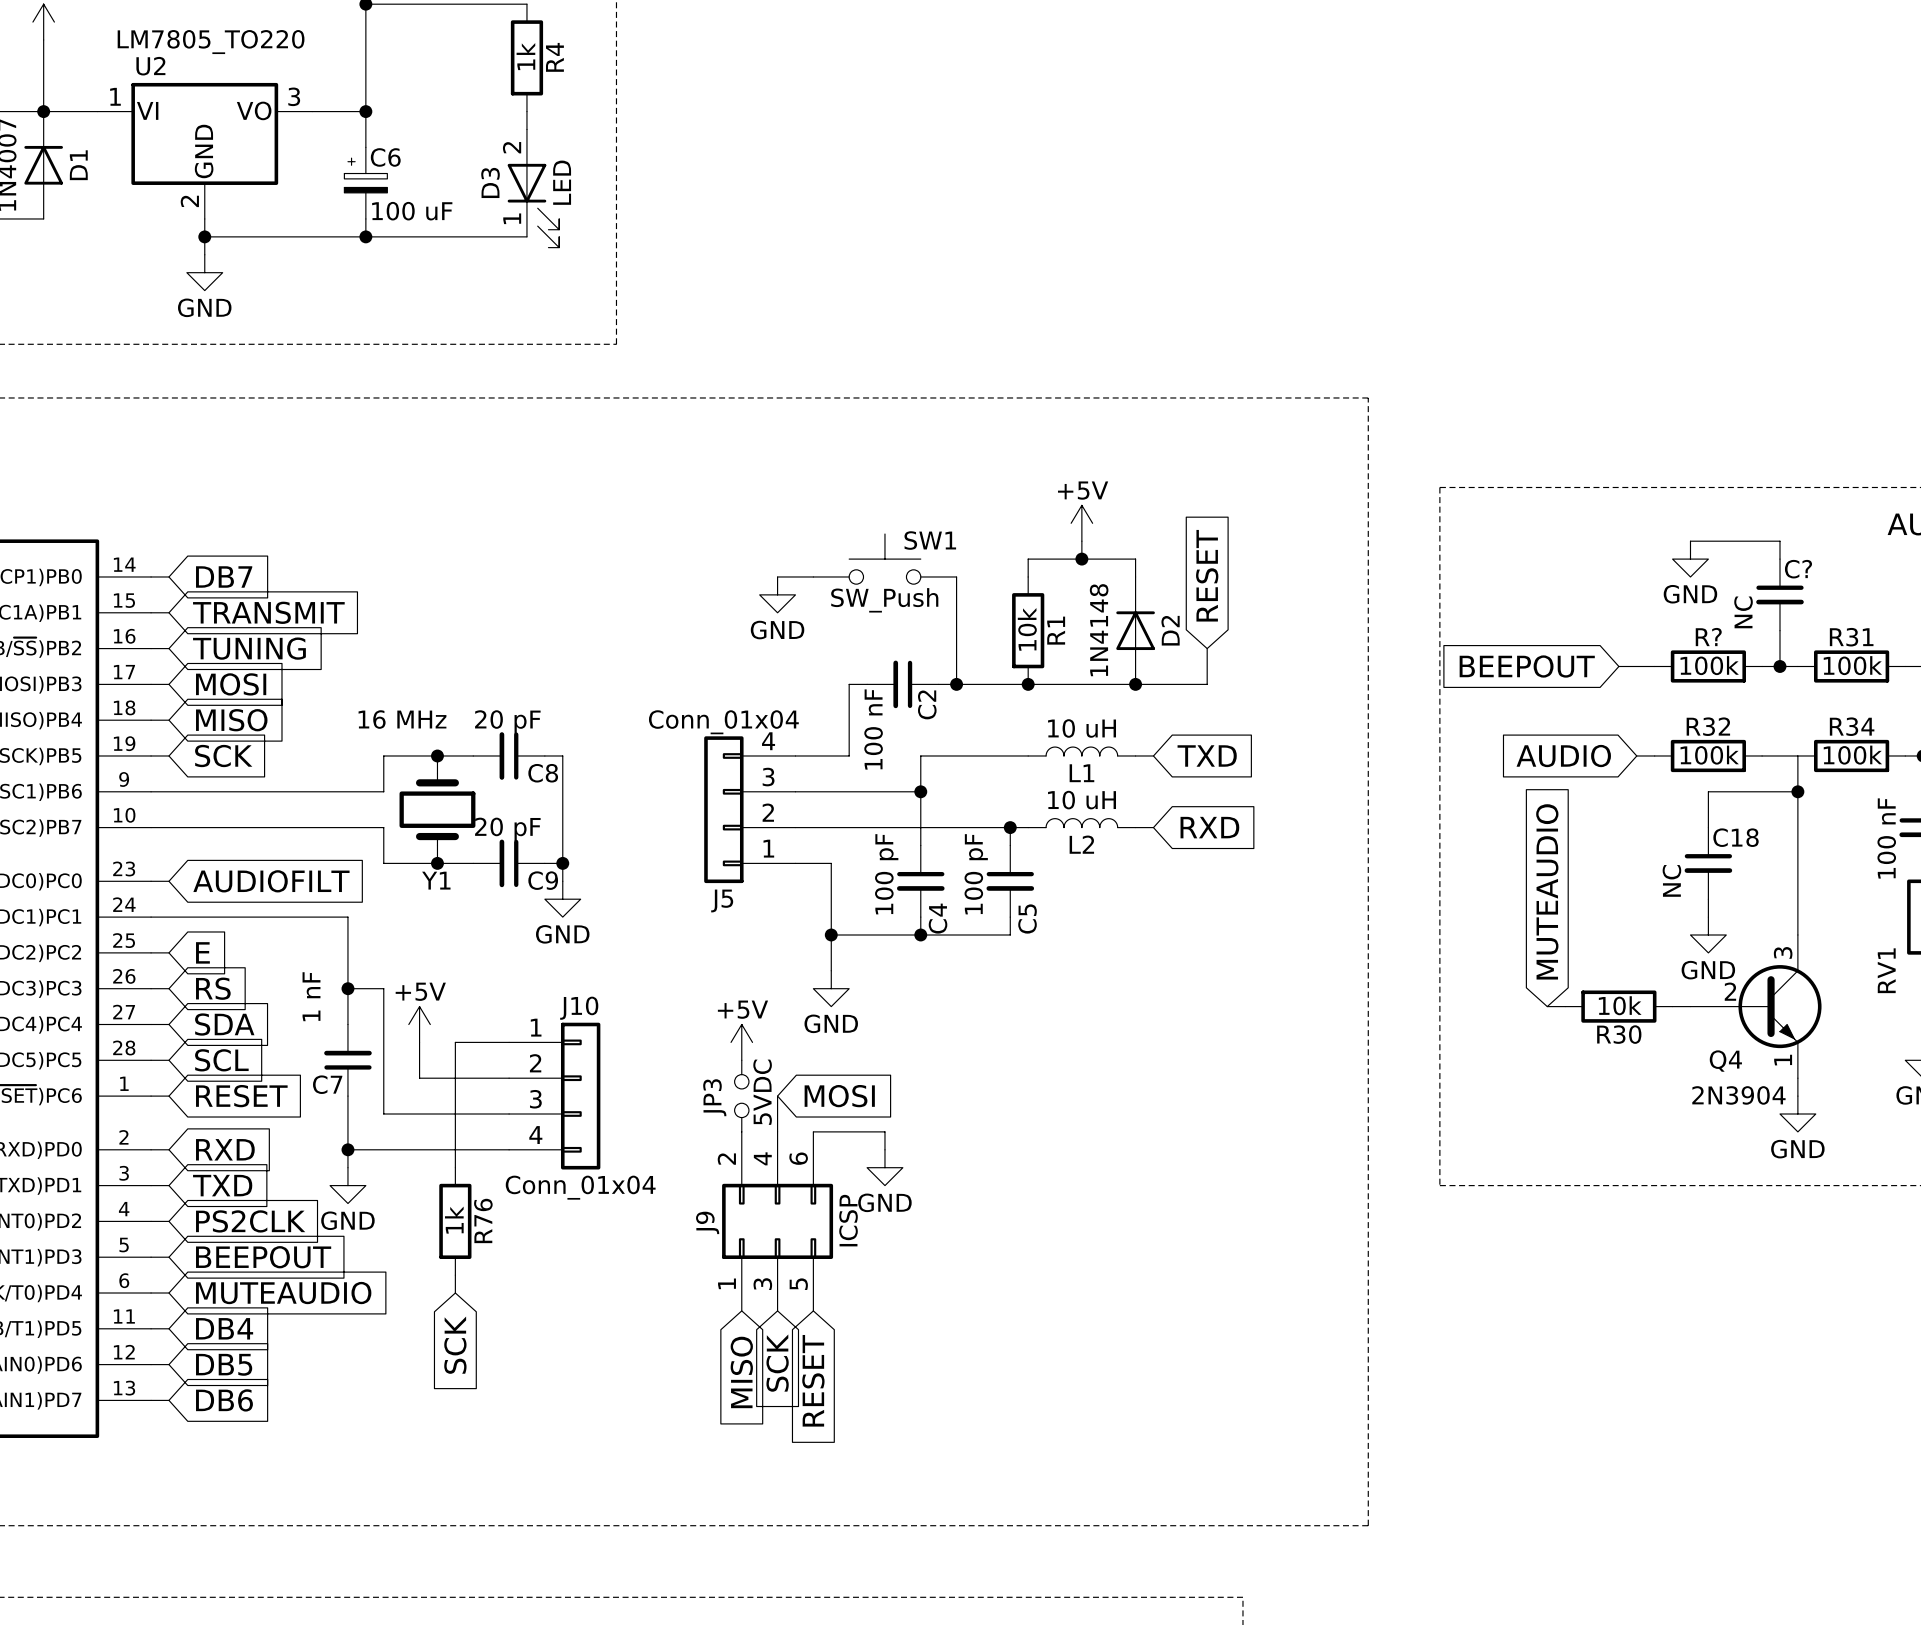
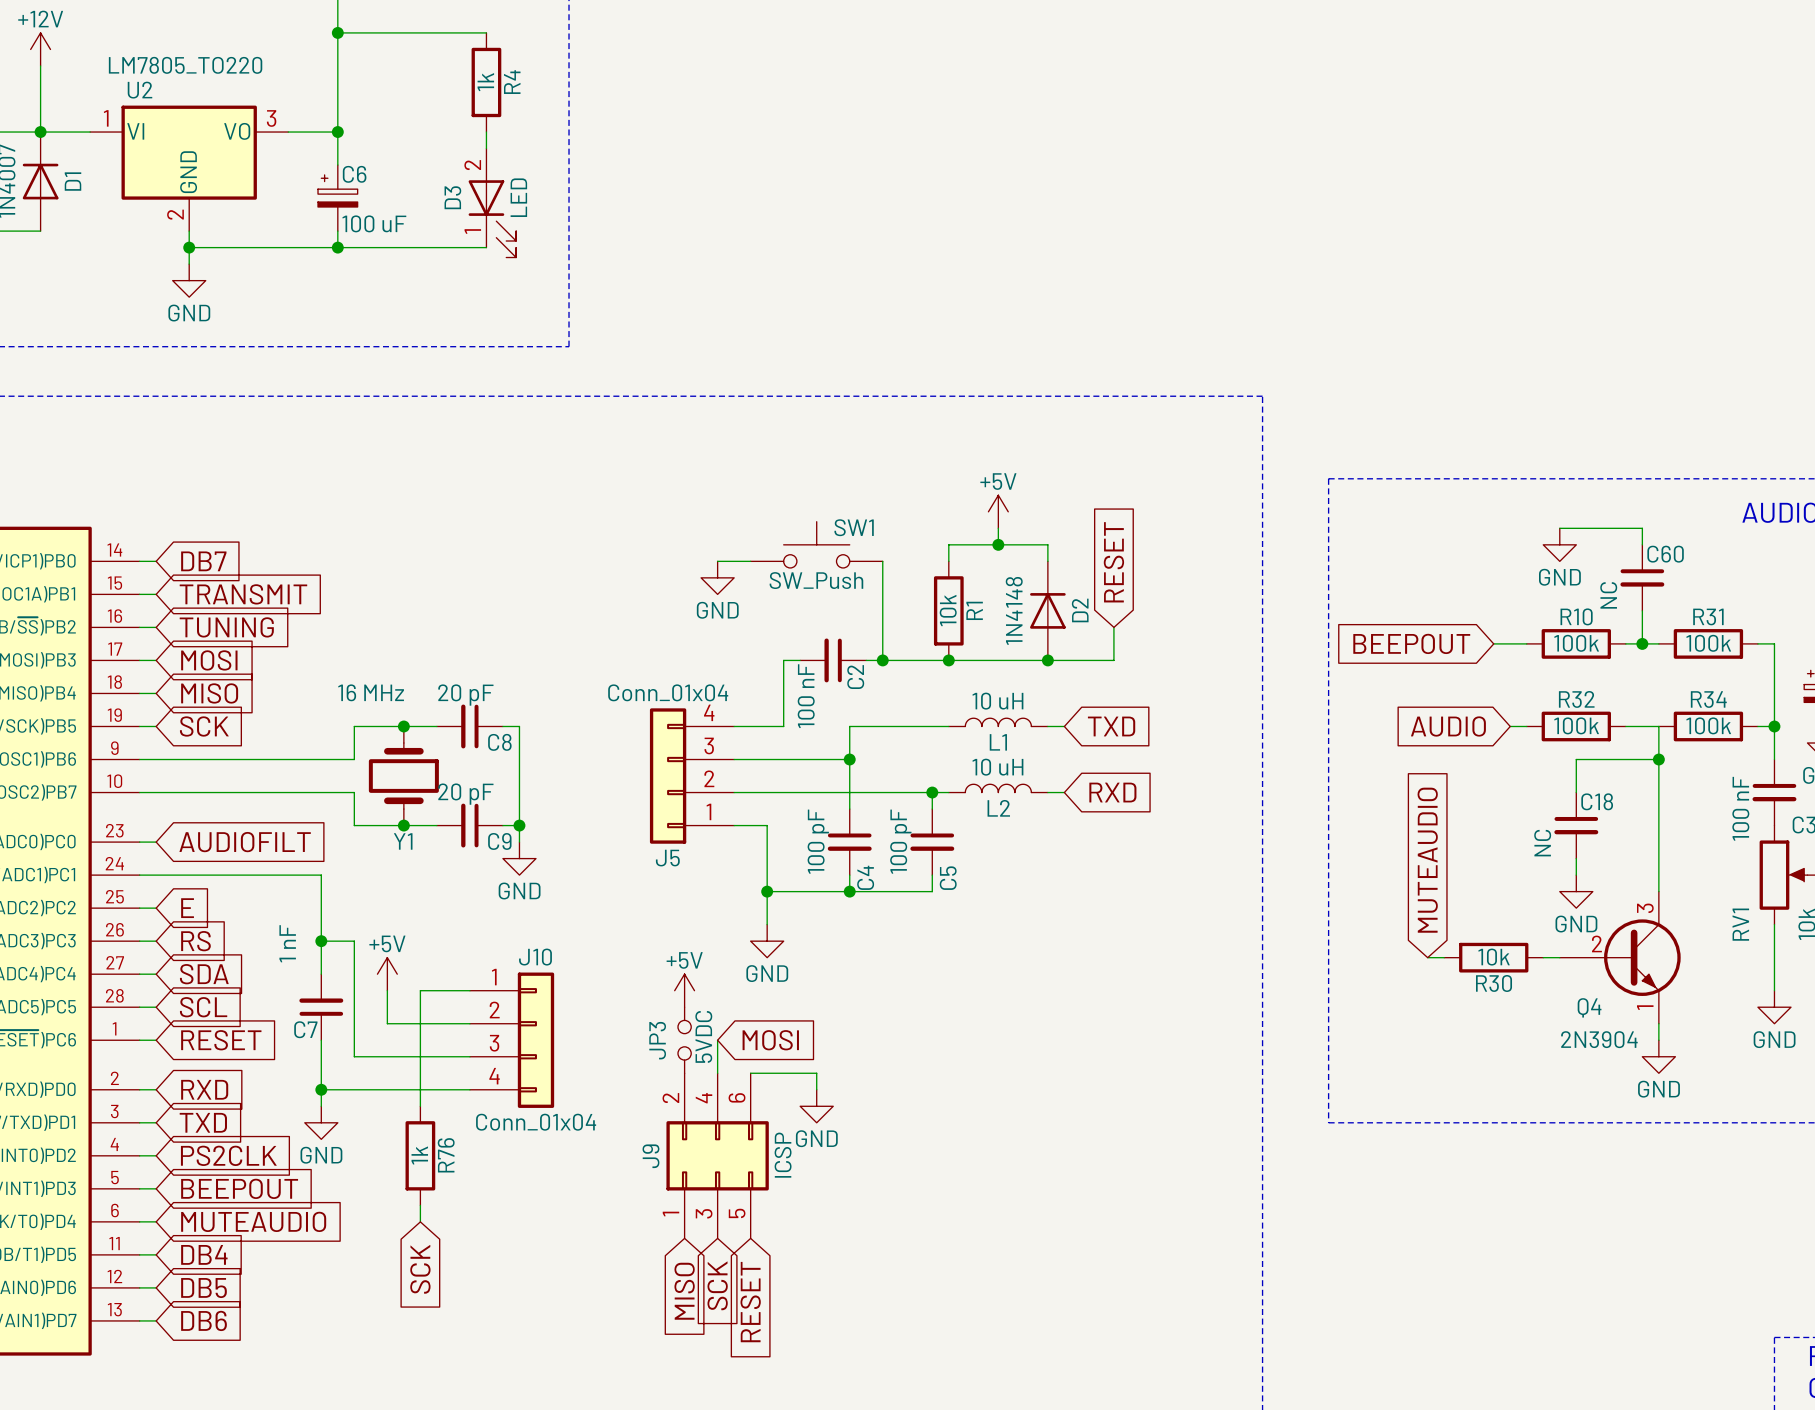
C? name: C? (1798, 569) -> C60 (1665, 554)
R? name: R? (1708, 637) -> R10 (1576, 616)

